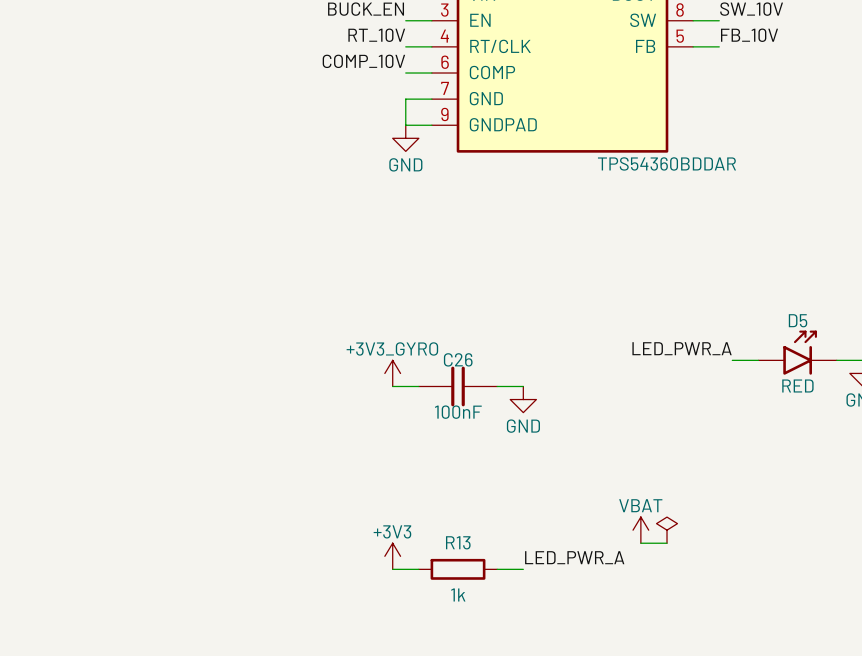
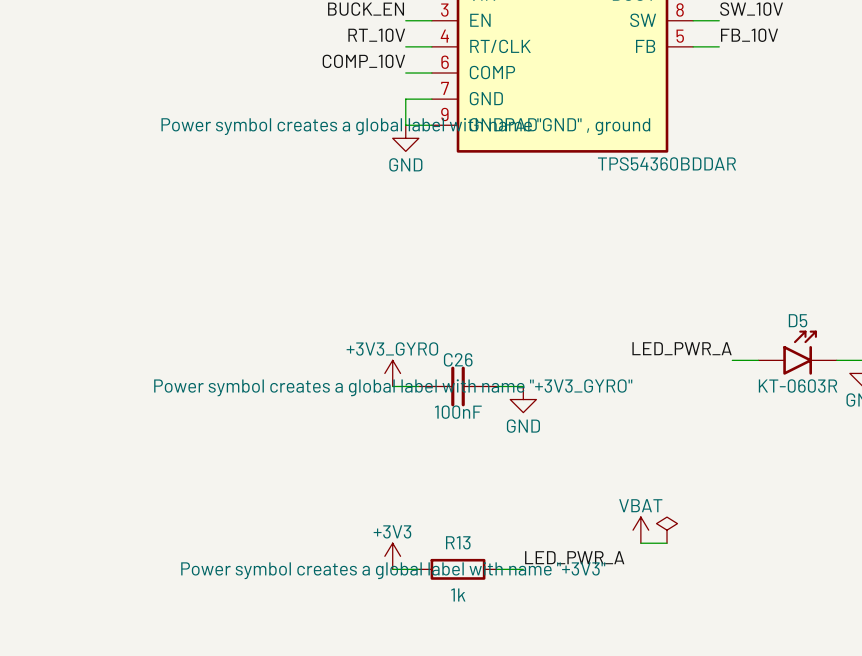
power symbol text: none -> Power symbol creates a global label with name "GND" , ground (405, 126)
D5 value: RED (797, 386) -> KT-0603R (798, 386)
power symbol text: none -> Power symbol creates a global label with name "+3V3_GYRO" (393, 387)
power symbol text: none -> Power symbol creates a global label with name "+3V3" (393, 570)

